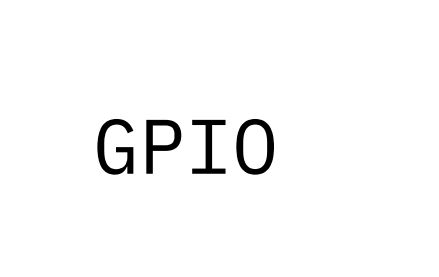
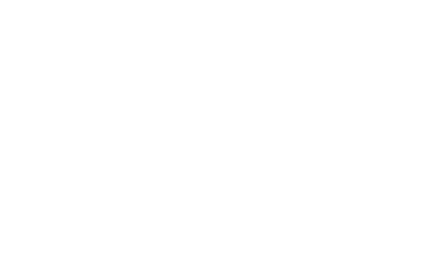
text: GPIO (185, 146) -> none

